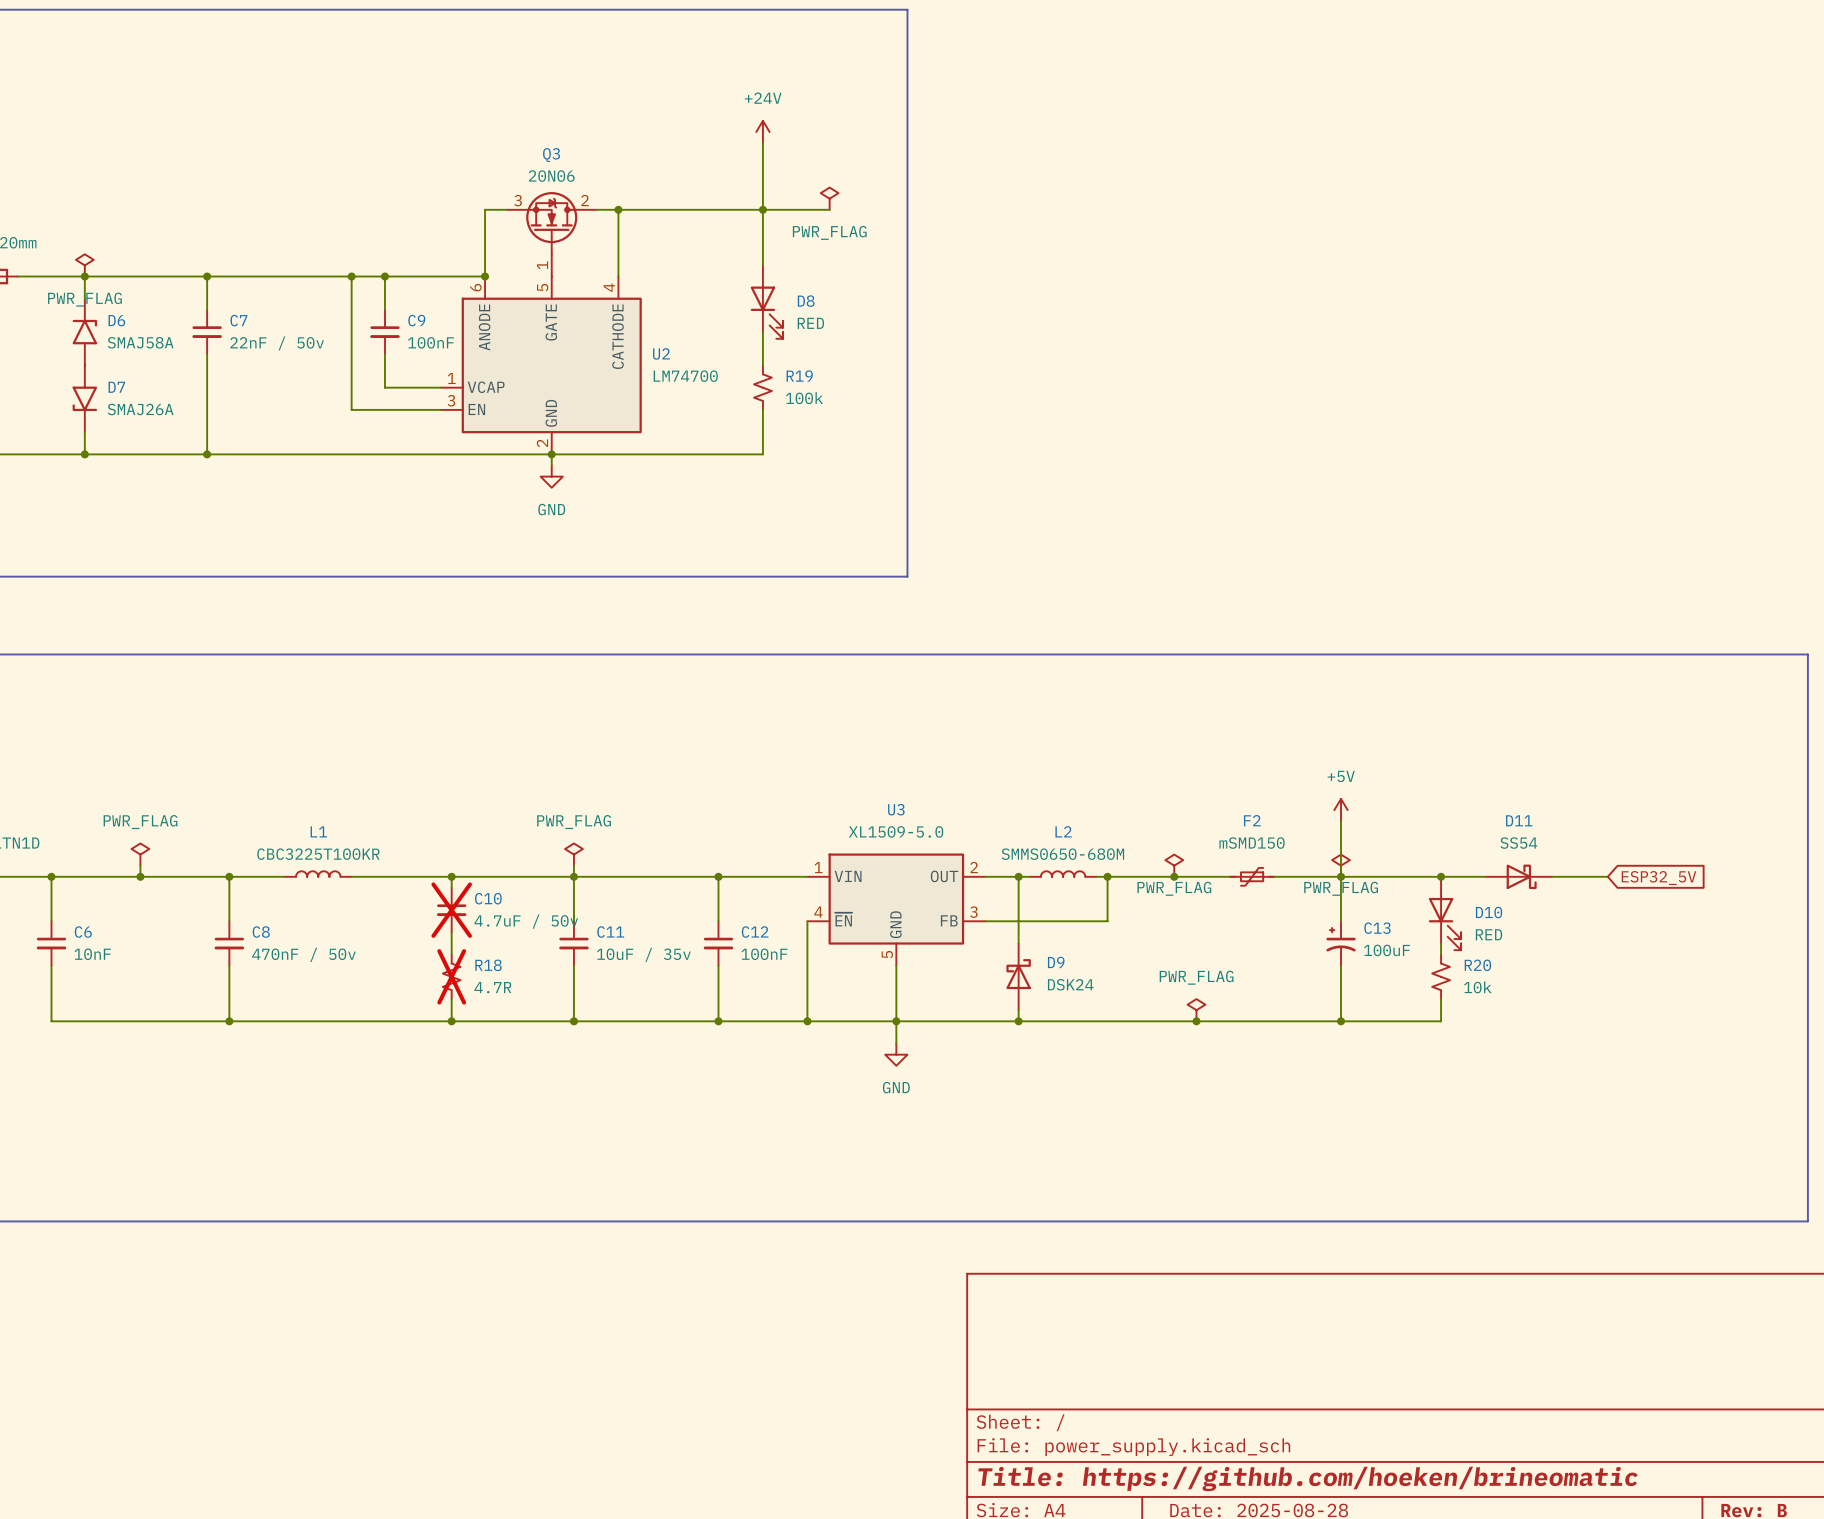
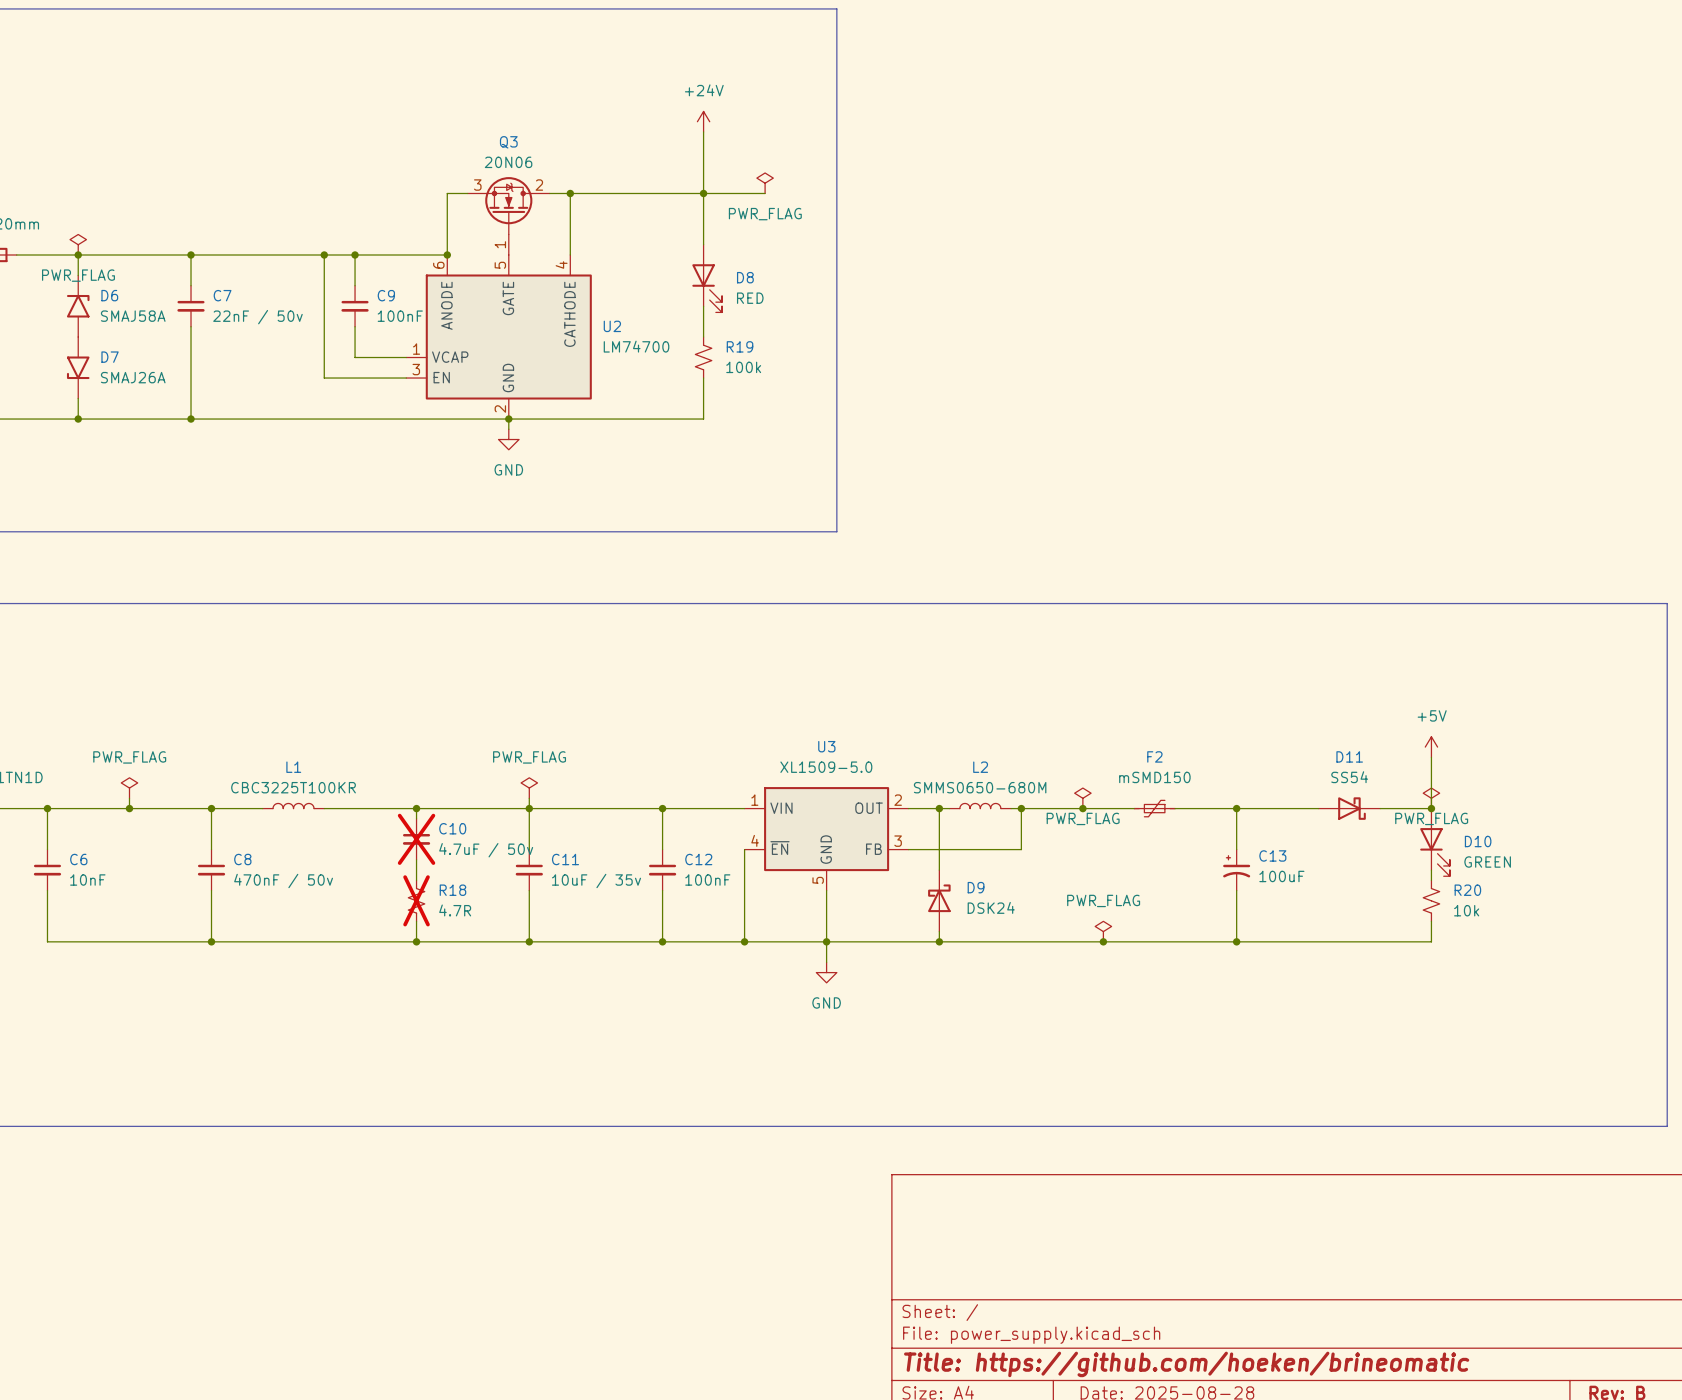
power symbol position: +5V (1341, 810) -> +5V (1431, 747)
wire: (1341, 821) (1341, 876) -> none
wire: none -> (1431, 757) (1431, 808) (1380, 808)
power symbol position: PWR_FLAG (1341, 865) -> PWR_FLAG (1431, 798)
junction: (1441, 876) -> none
D11 position: (1518, 876) -> (1349, 808)
wire: (1552, 876) (1607, 876) -> none
junction: none -> (1431, 808)
global label: ESP32_5V (1658, 878) -> none
D10 position: (1444, 913) -> (1435, 842)
D10 value: RED (1489, 934) -> GREEN (1487, 862)
wire: (1441, 943) (1441, 954) -> (1431, 870) (1431, 880)
R20 position: (1441, 976) -> (1431, 900)
wire: (1441, 999) (1441, 1021) -> (1431, 921) (1431, 941) (1328, 941)

